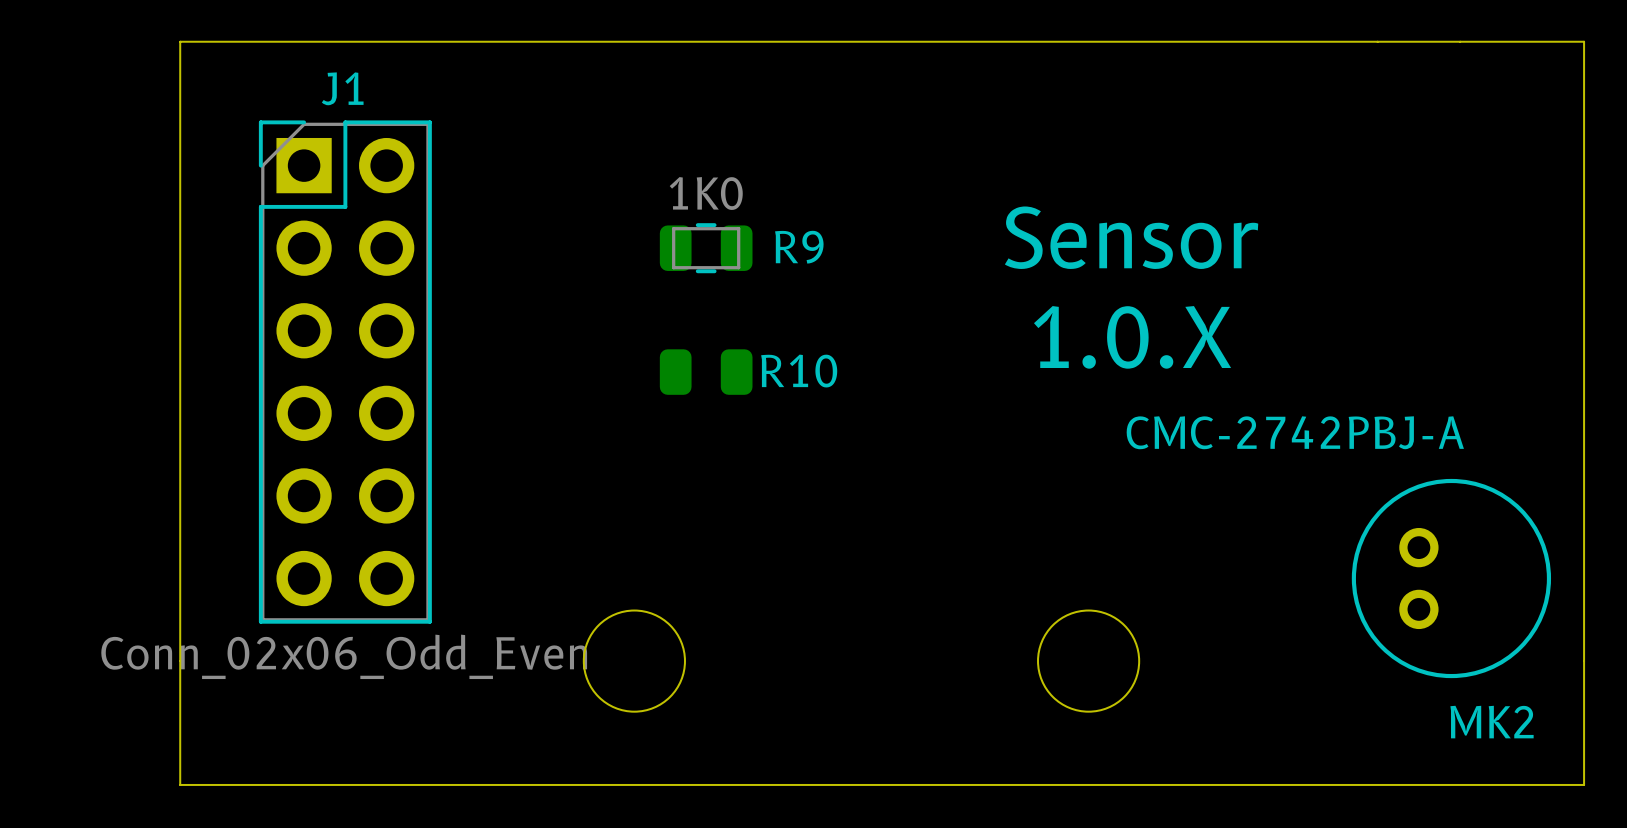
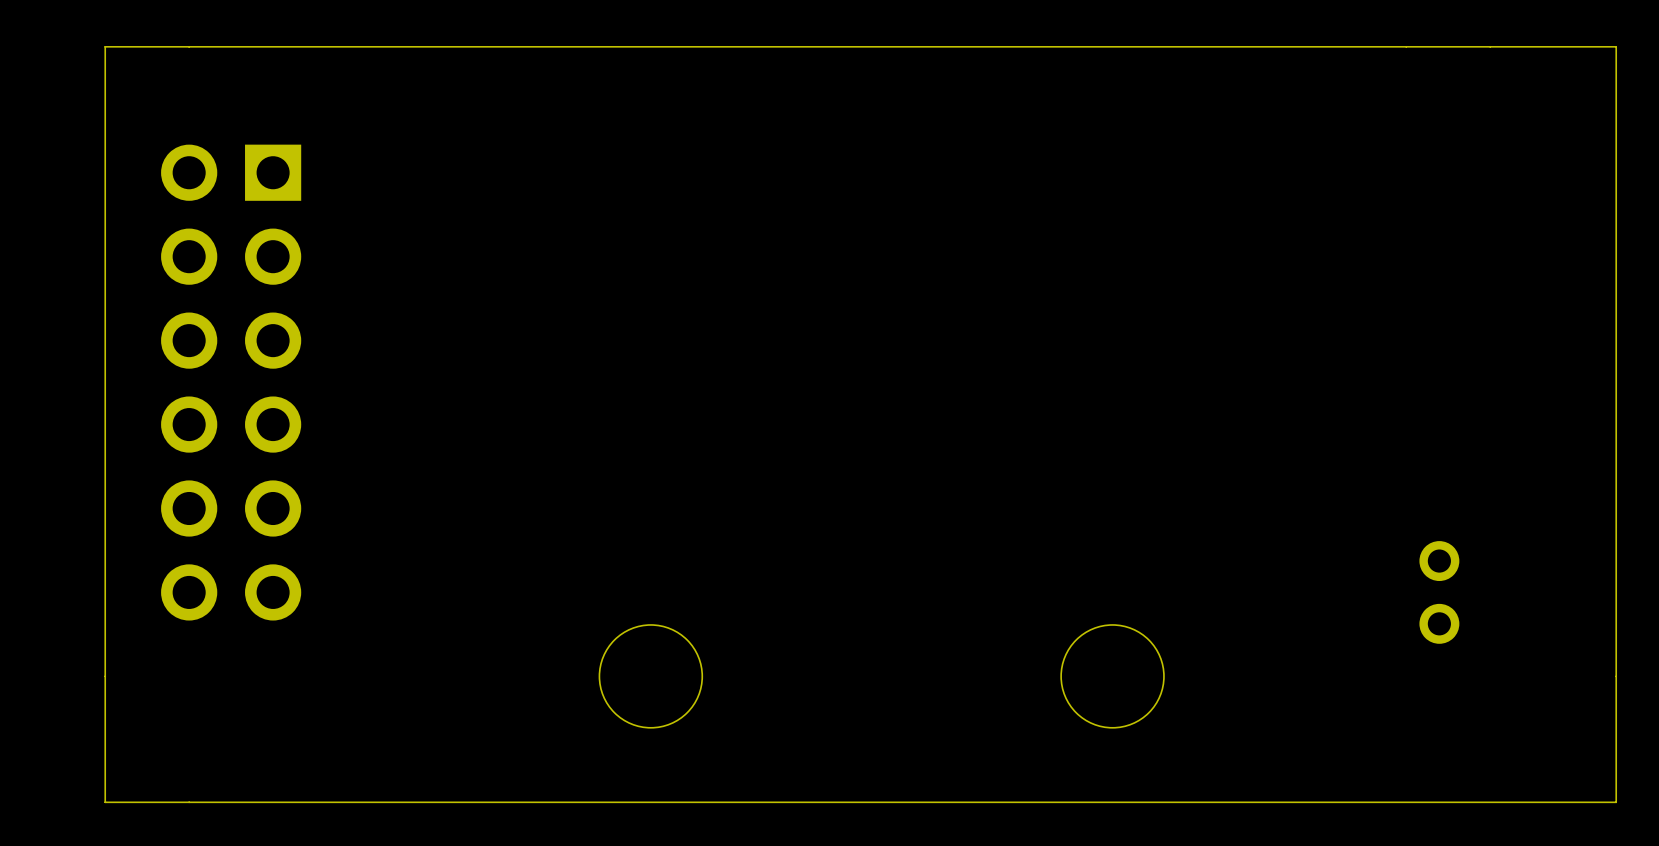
board edge: (180, 41) (180, 784) -> (189, 46) (105, 46) (105, 802) (189, 802)
text: Sensor (1131, 237) -> none
R9: 1K0 (706, 248) -> none
text: 1.0.X (1132, 337) -> none
J1 side: bottom (345, 372) -> top (231, 382)
R10: (706, 372) -> none
MK2 side: bottom (1451, 578) -> top (1439, 592)

